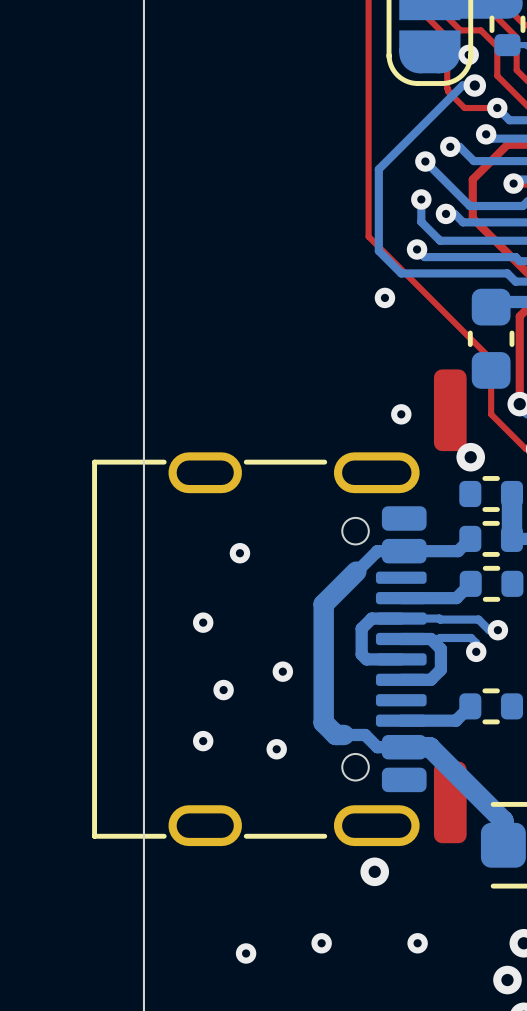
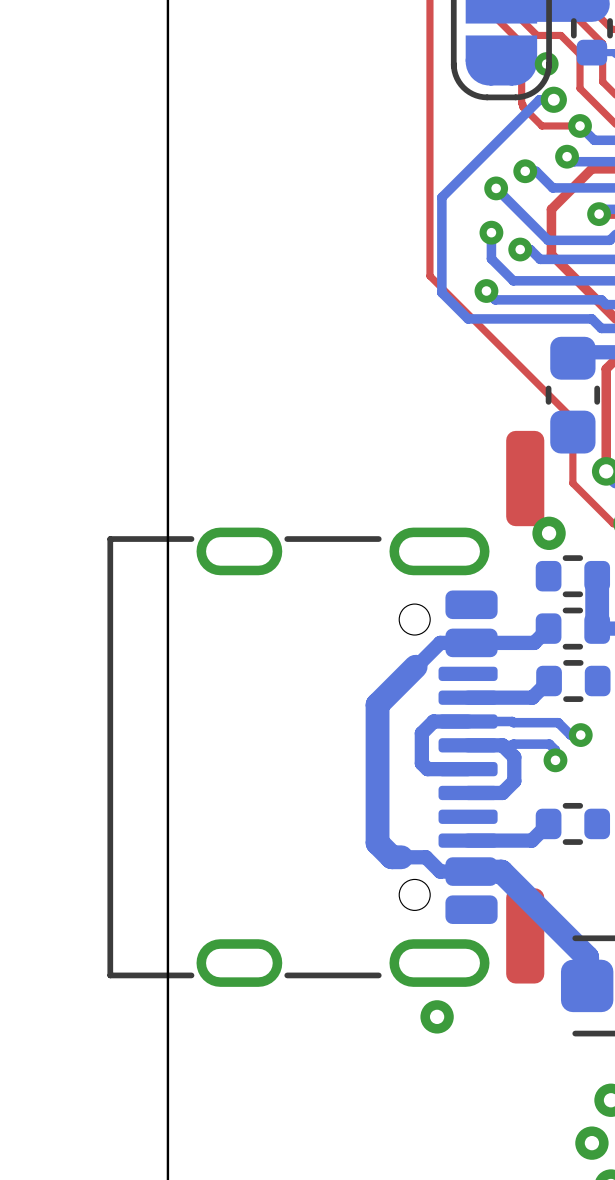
via: (384, 297) -> none
via: (401, 414) -> none
via: (239, 553) -> none
via: (203, 622) -> none
via: (282, 671) -> none
via: (223, 690) -> none
via: (203, 741) -> none
via: (276, 749) -> none
via: (321, 943) -> none
via: (417, 943) -> none
via: (246, 953) -> none

